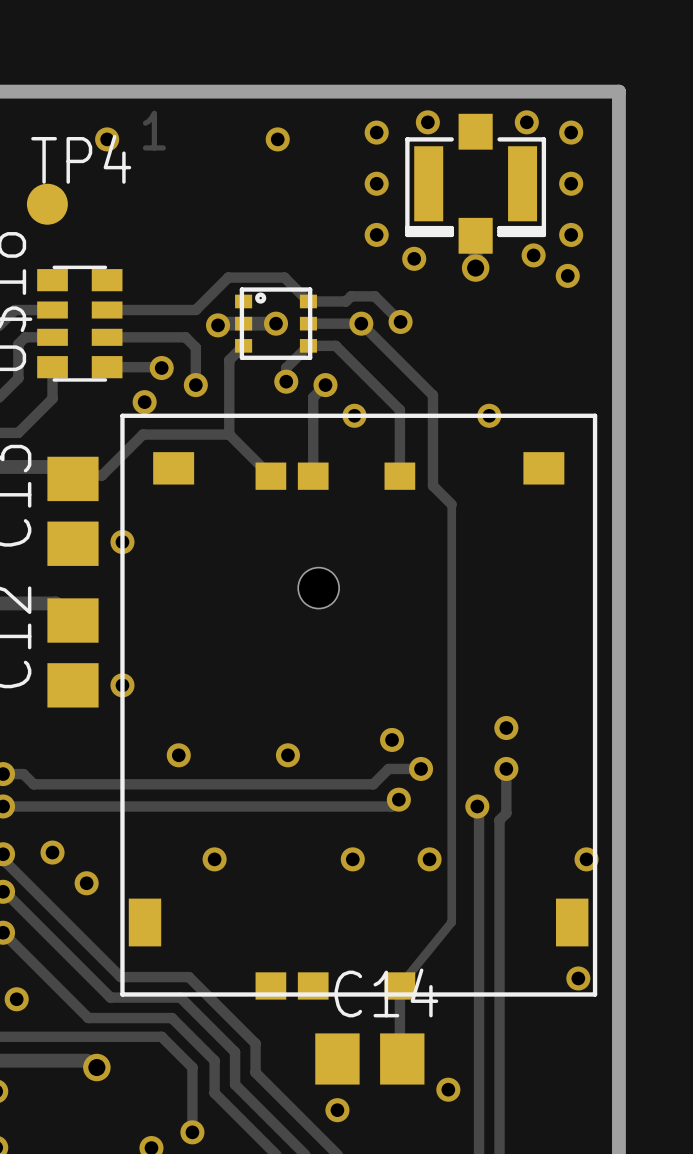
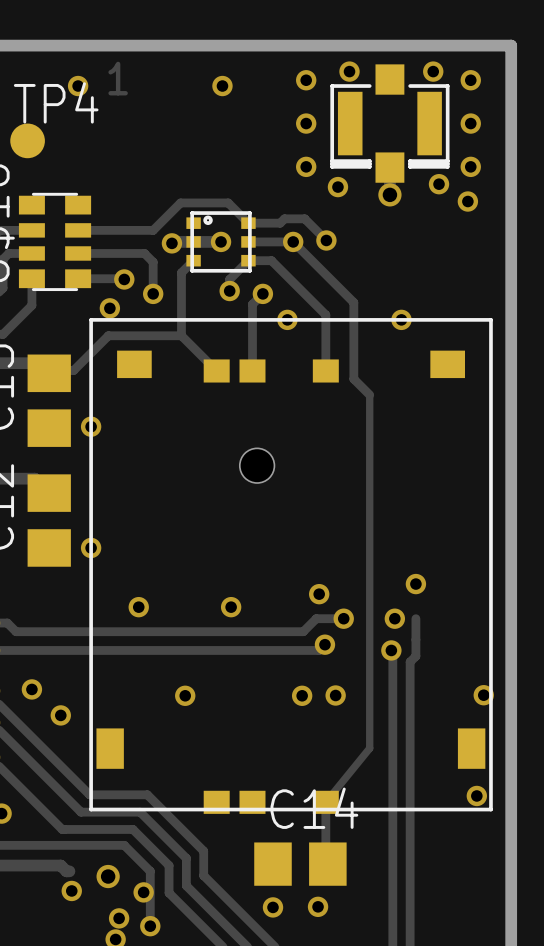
via position: (506, 768) -> (394, 618)
via position: (214, 859) -> (185, 695)
via position: (352, 859) -> (302, 695)
via position: (429, 859) -> (335, 695)
via position: (96, 1067) -> (108, 876)
via position: (448, 1089) -> (318, 906)
via: none -> (71, 890)
via: none -> (143, 892)
via: none -> (119, 918)

